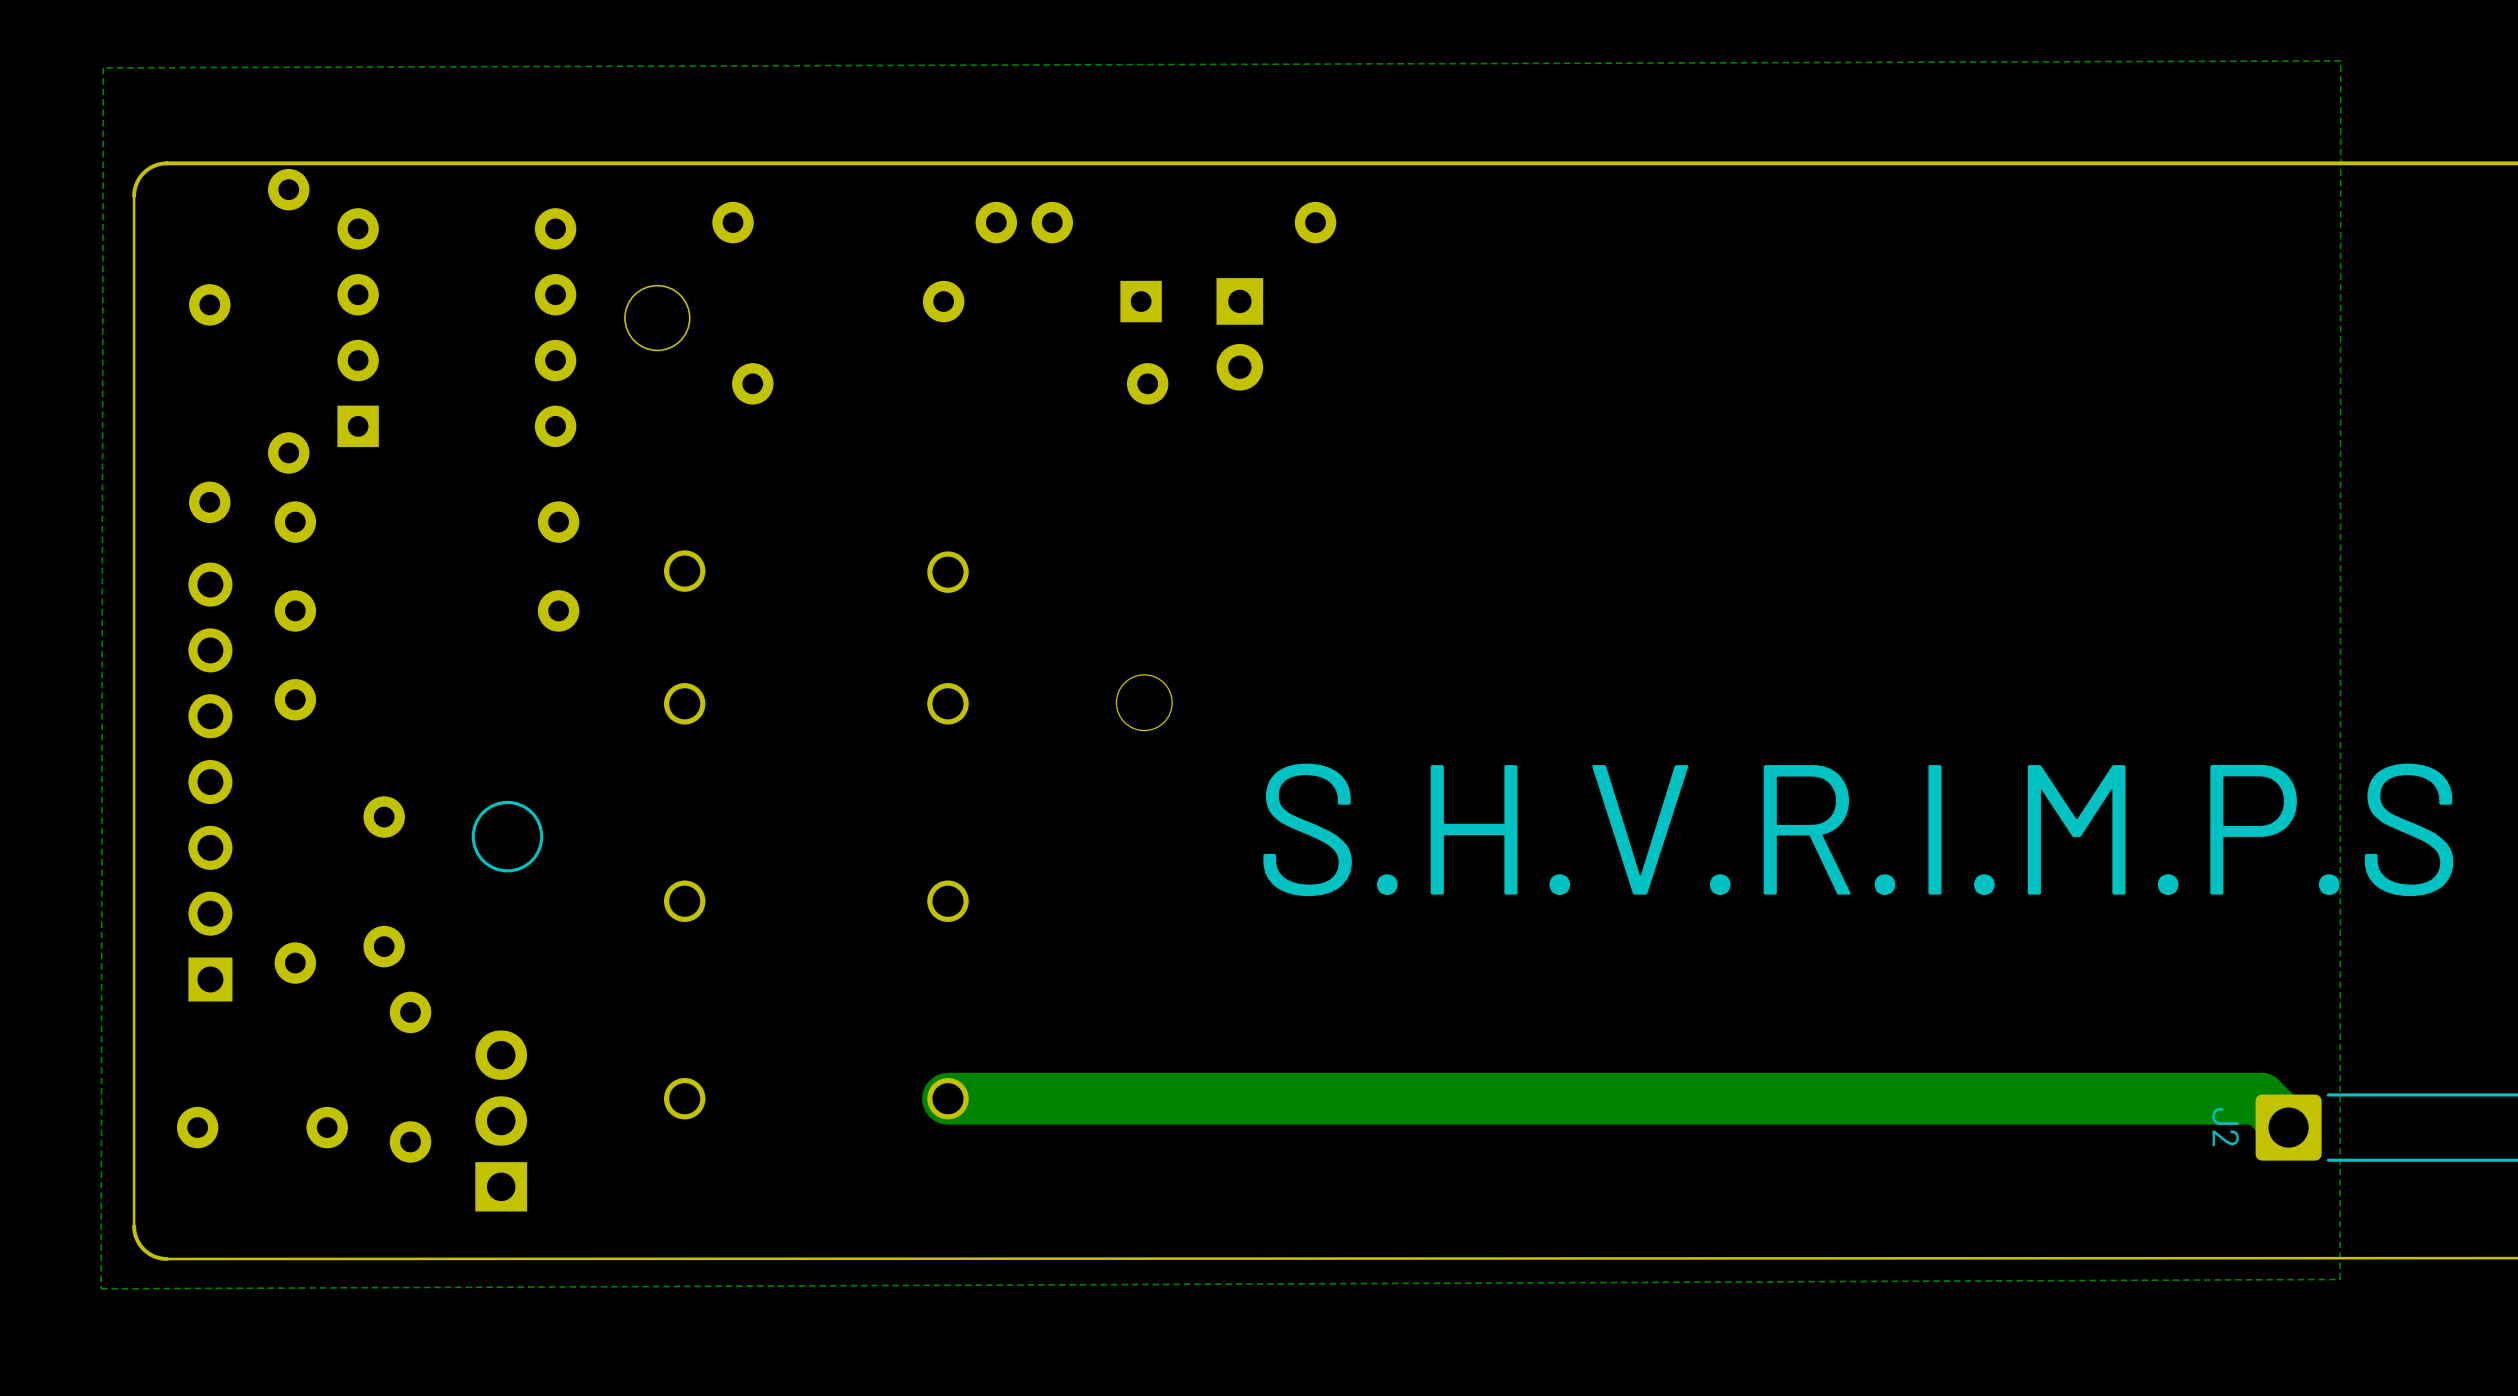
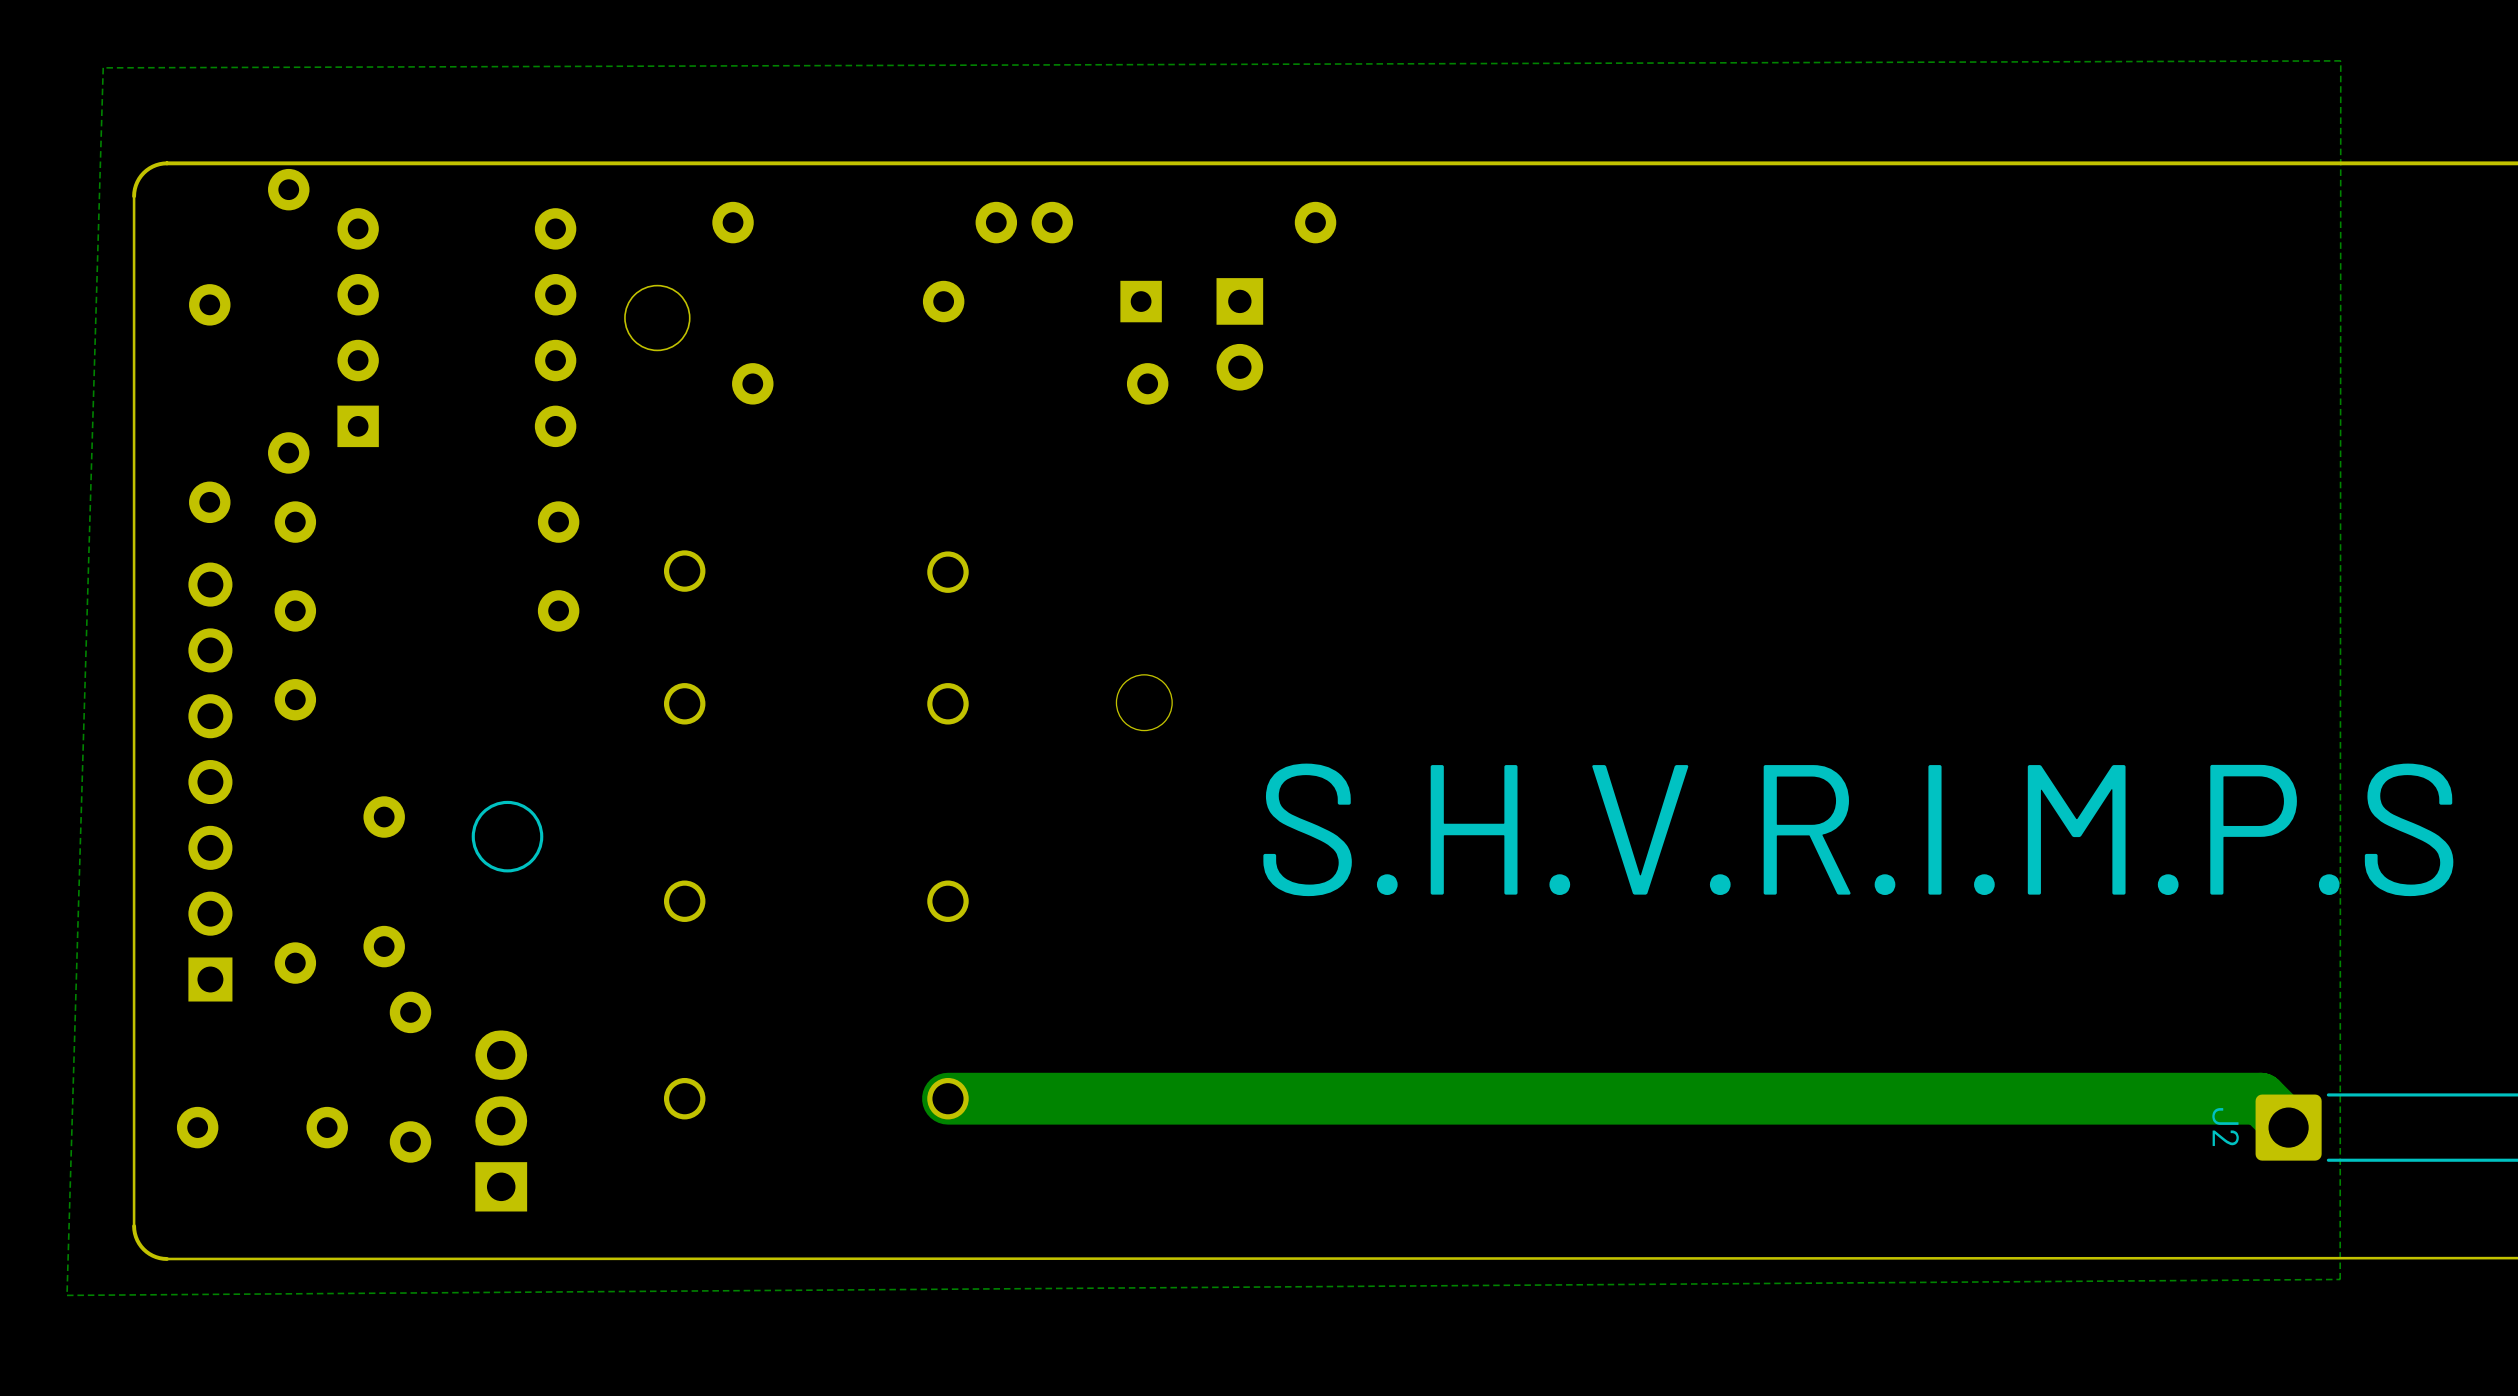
zone outline: (103, 67) (101, 1288) (2340, 1279) -> (103, 67) (67, 1295) (2340, 1279)

